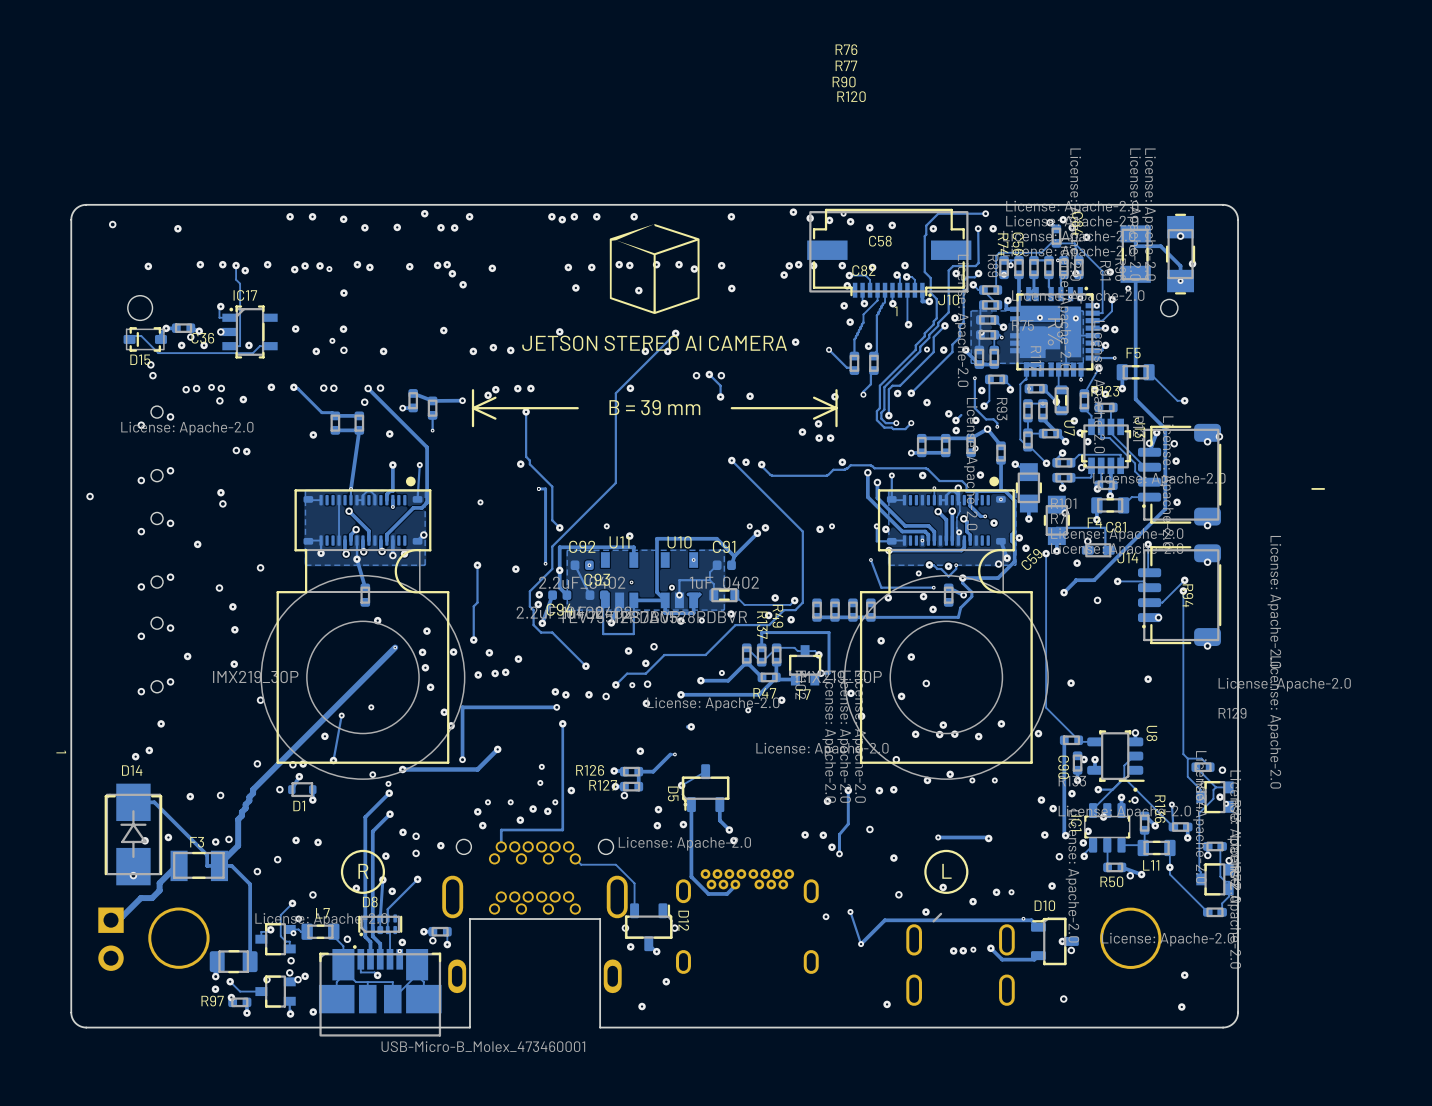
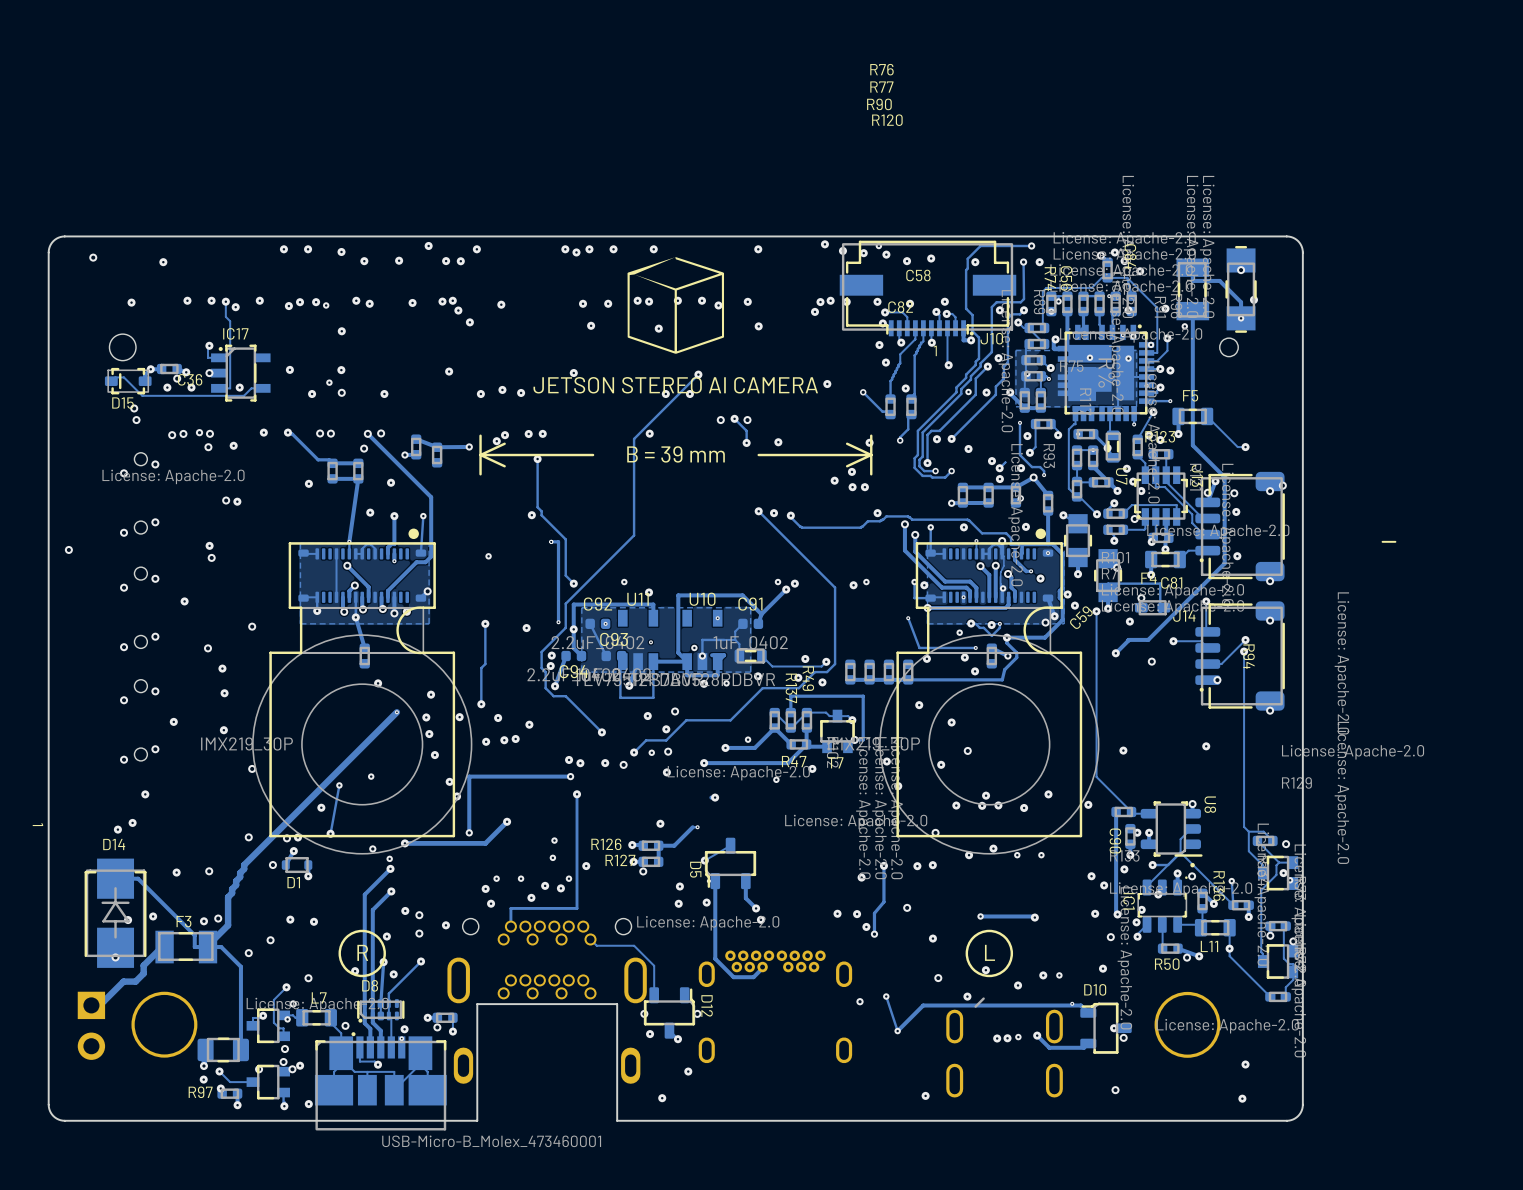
track: (432, 415) (432, 430) -> none
via: (432, 430) -> none
via: none -> (370, 512)

